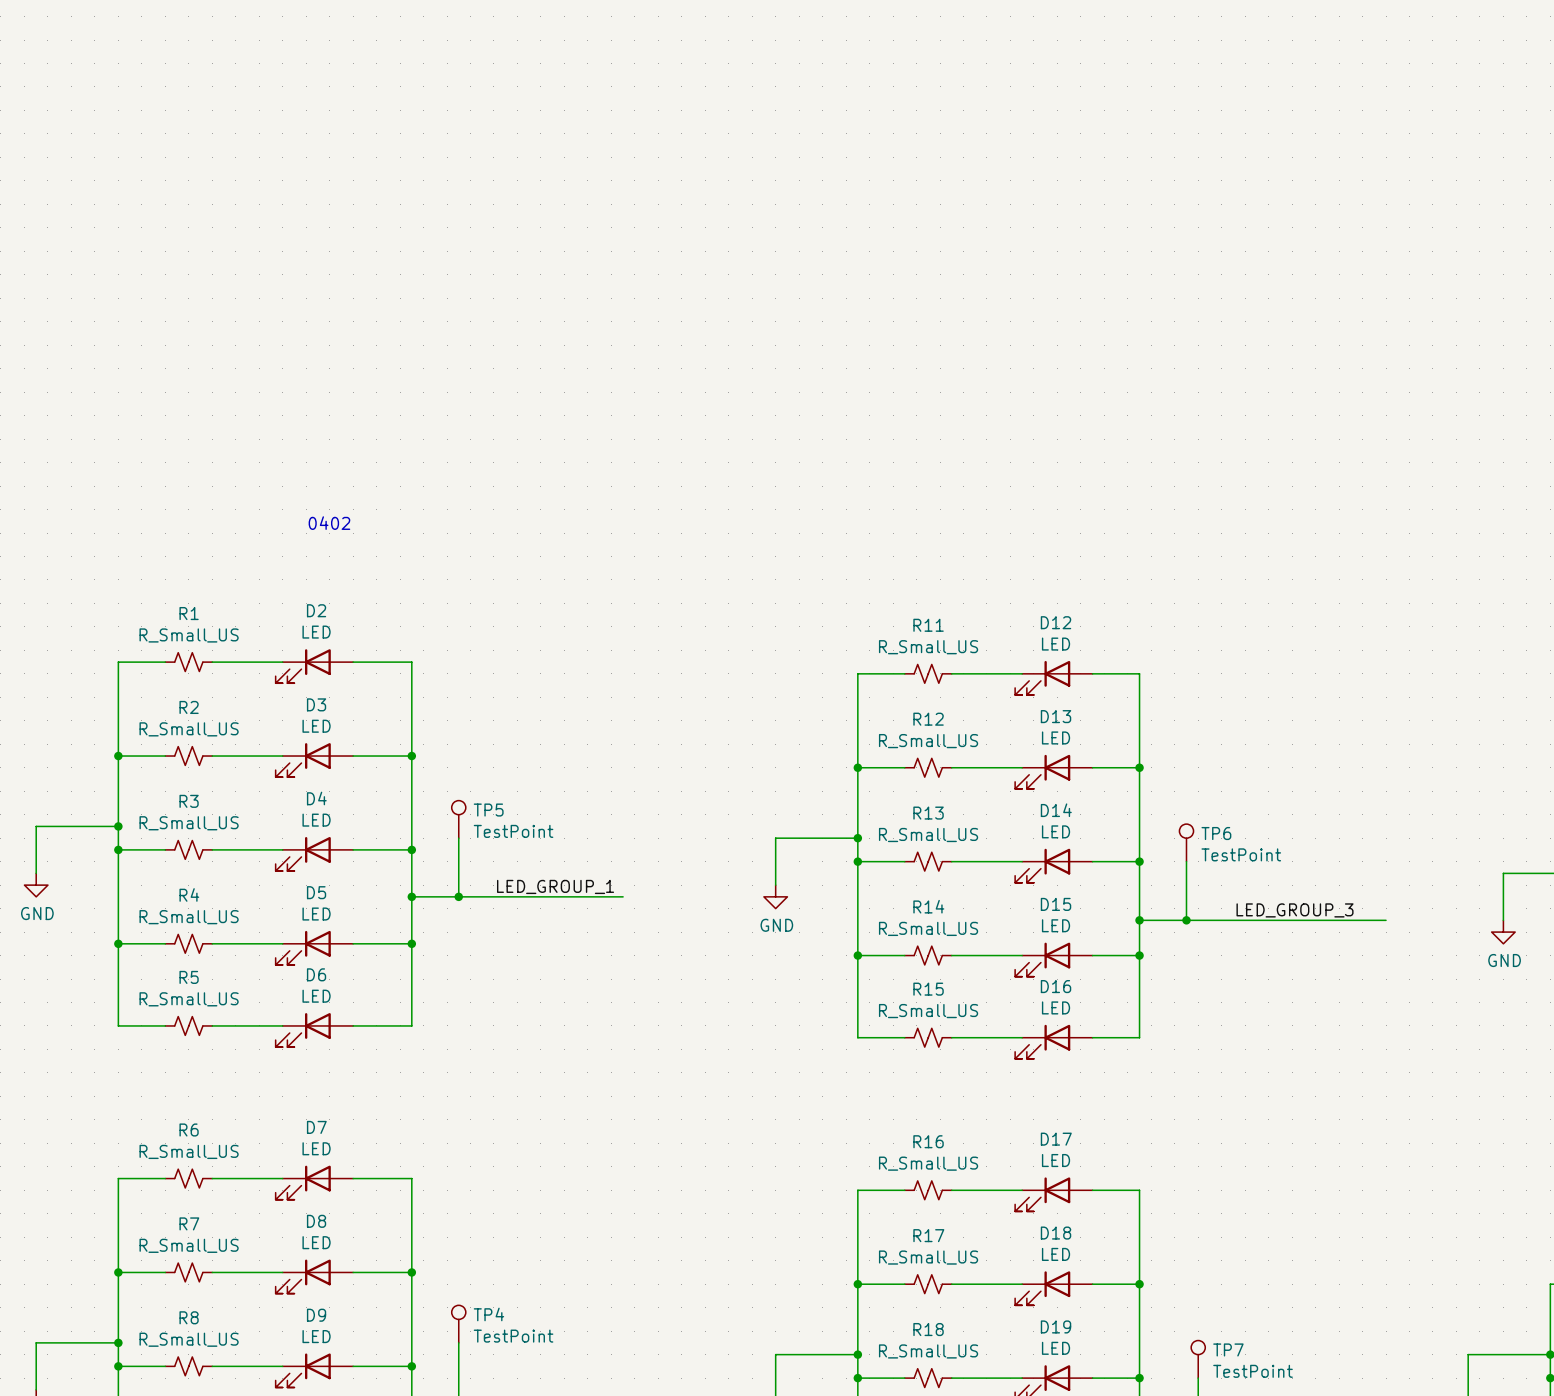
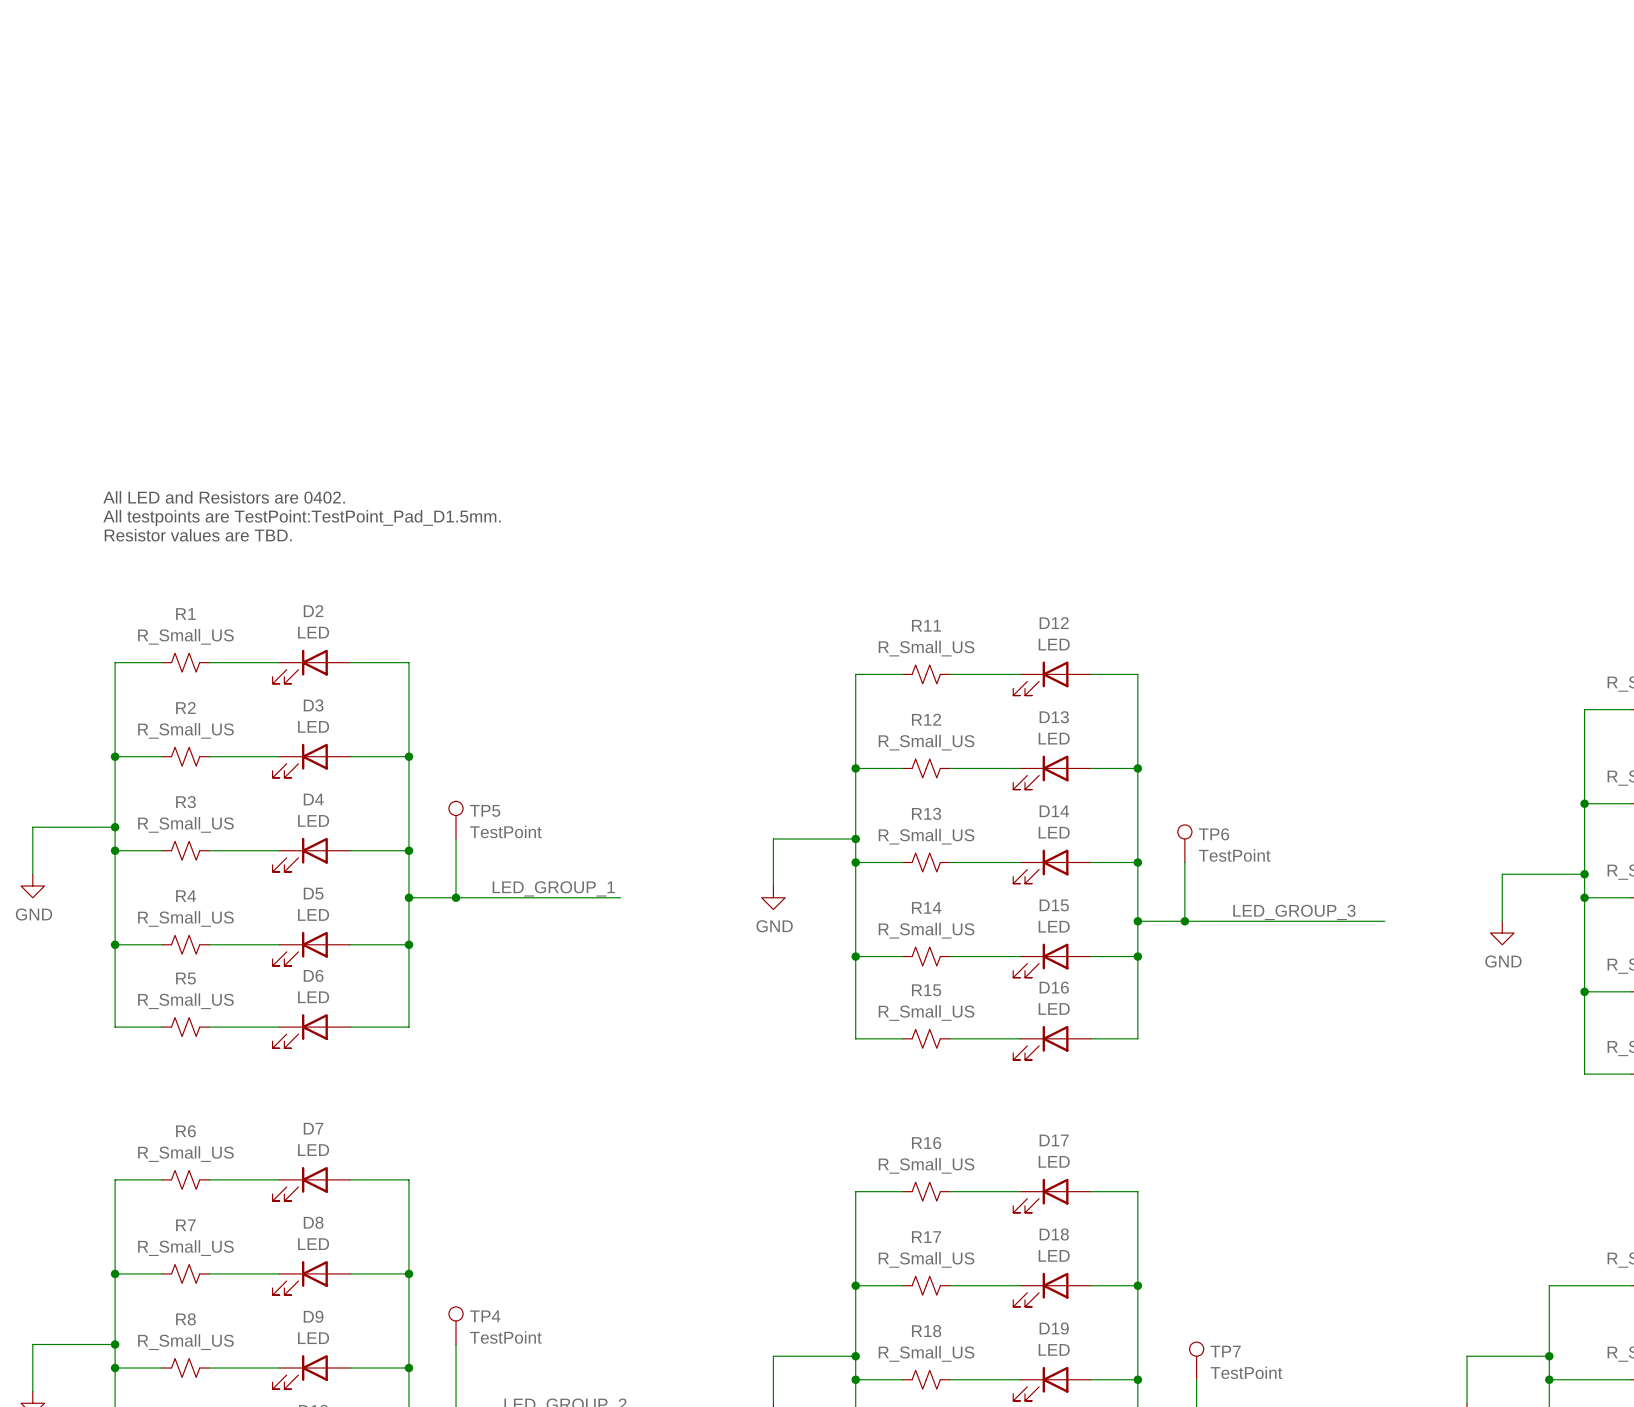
text: none -> All LED and Resistors are 0402. (224, 497)
text: none -> All testpoints are TestPoint:TestPoint_Pad_D1.5mm. (302, 517)
text: 0402 (329, 523) -> none
text: none -> Resistor values are TBD. (198, 535)

